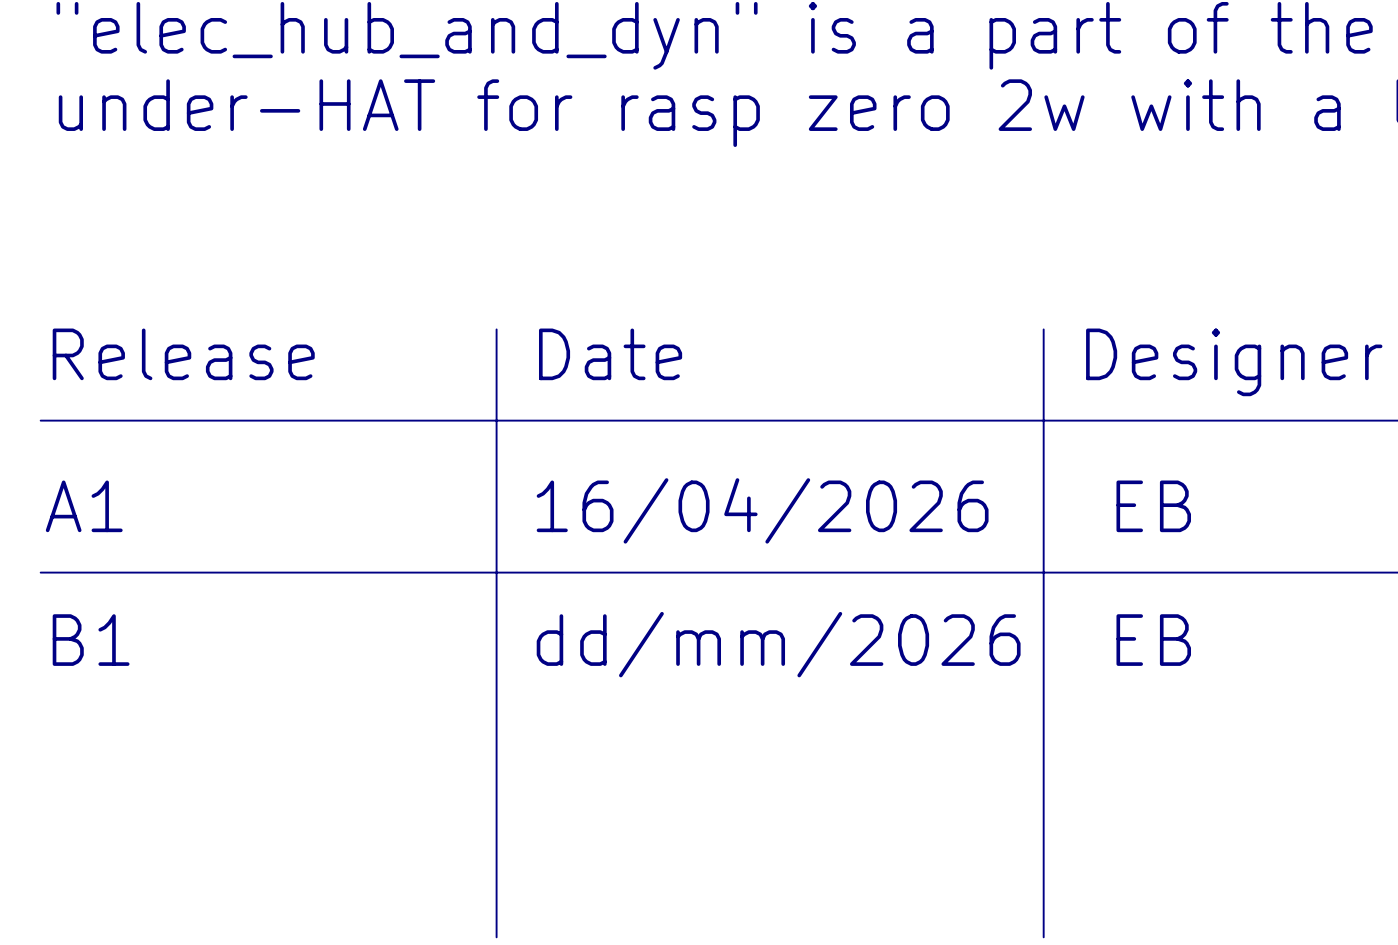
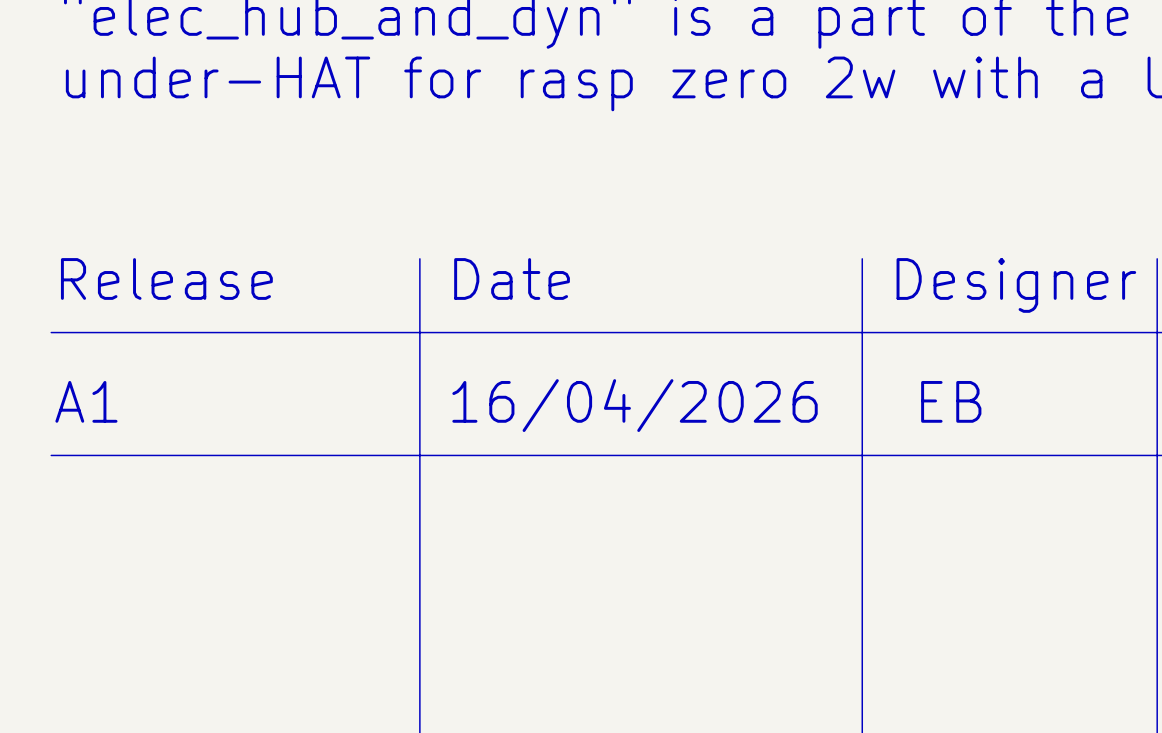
text: B1 (91, 640) -> none
text: EB (1153, 640) -> none
text: dd/mm/2026 (778, 644) -> none

